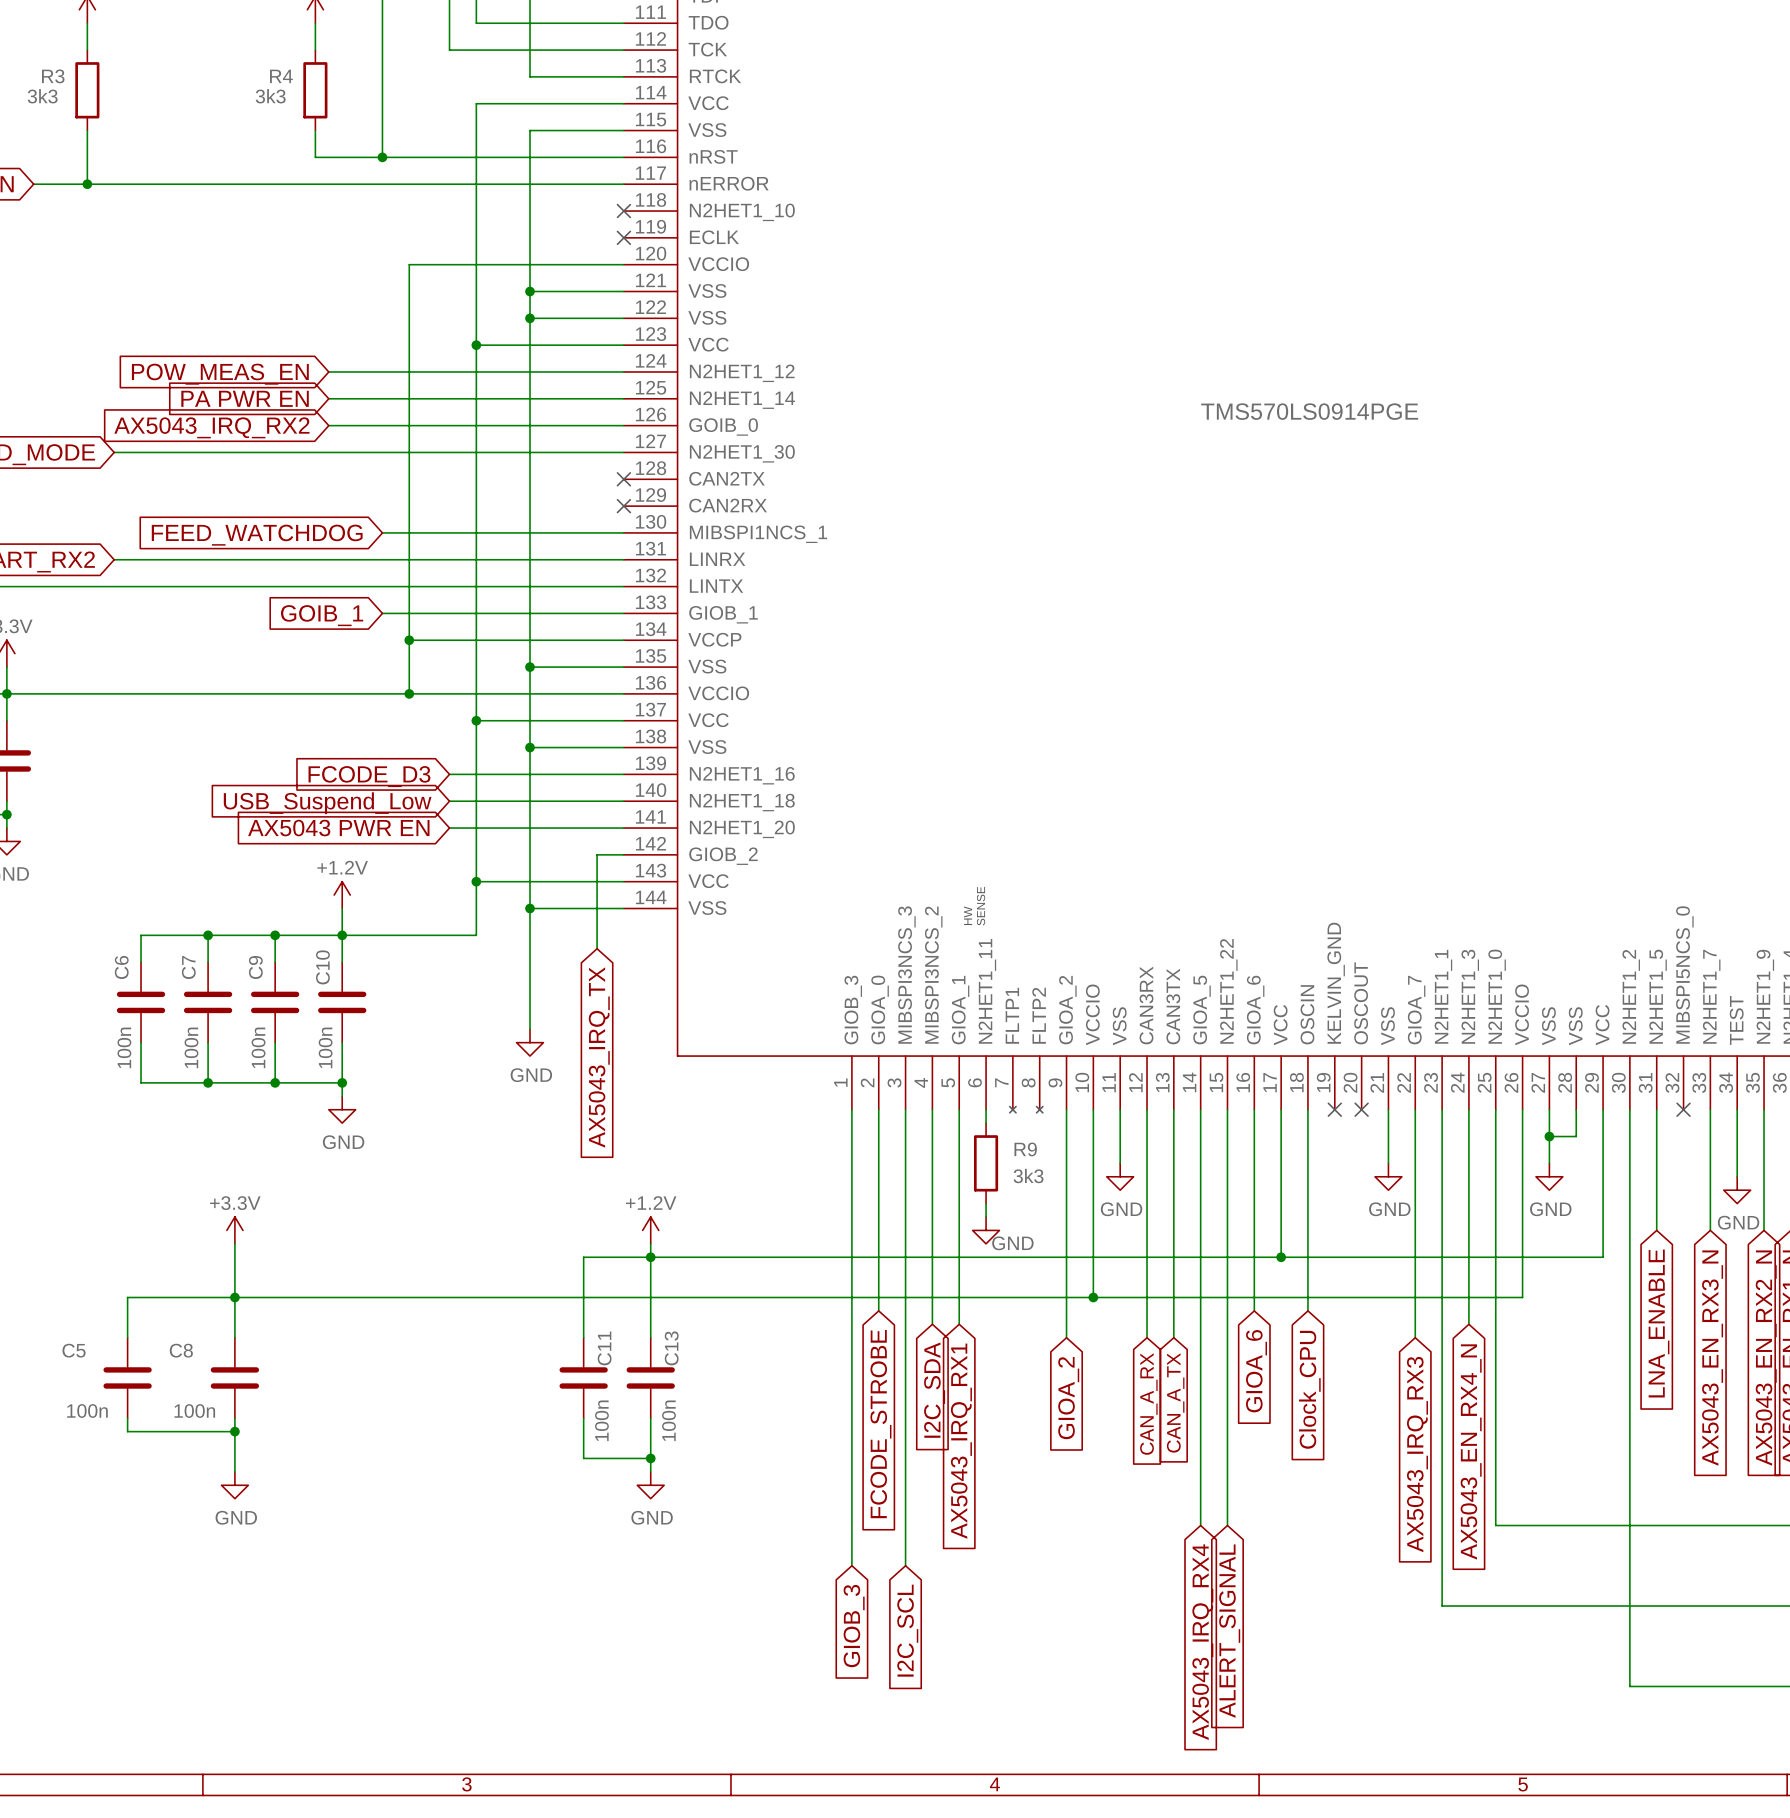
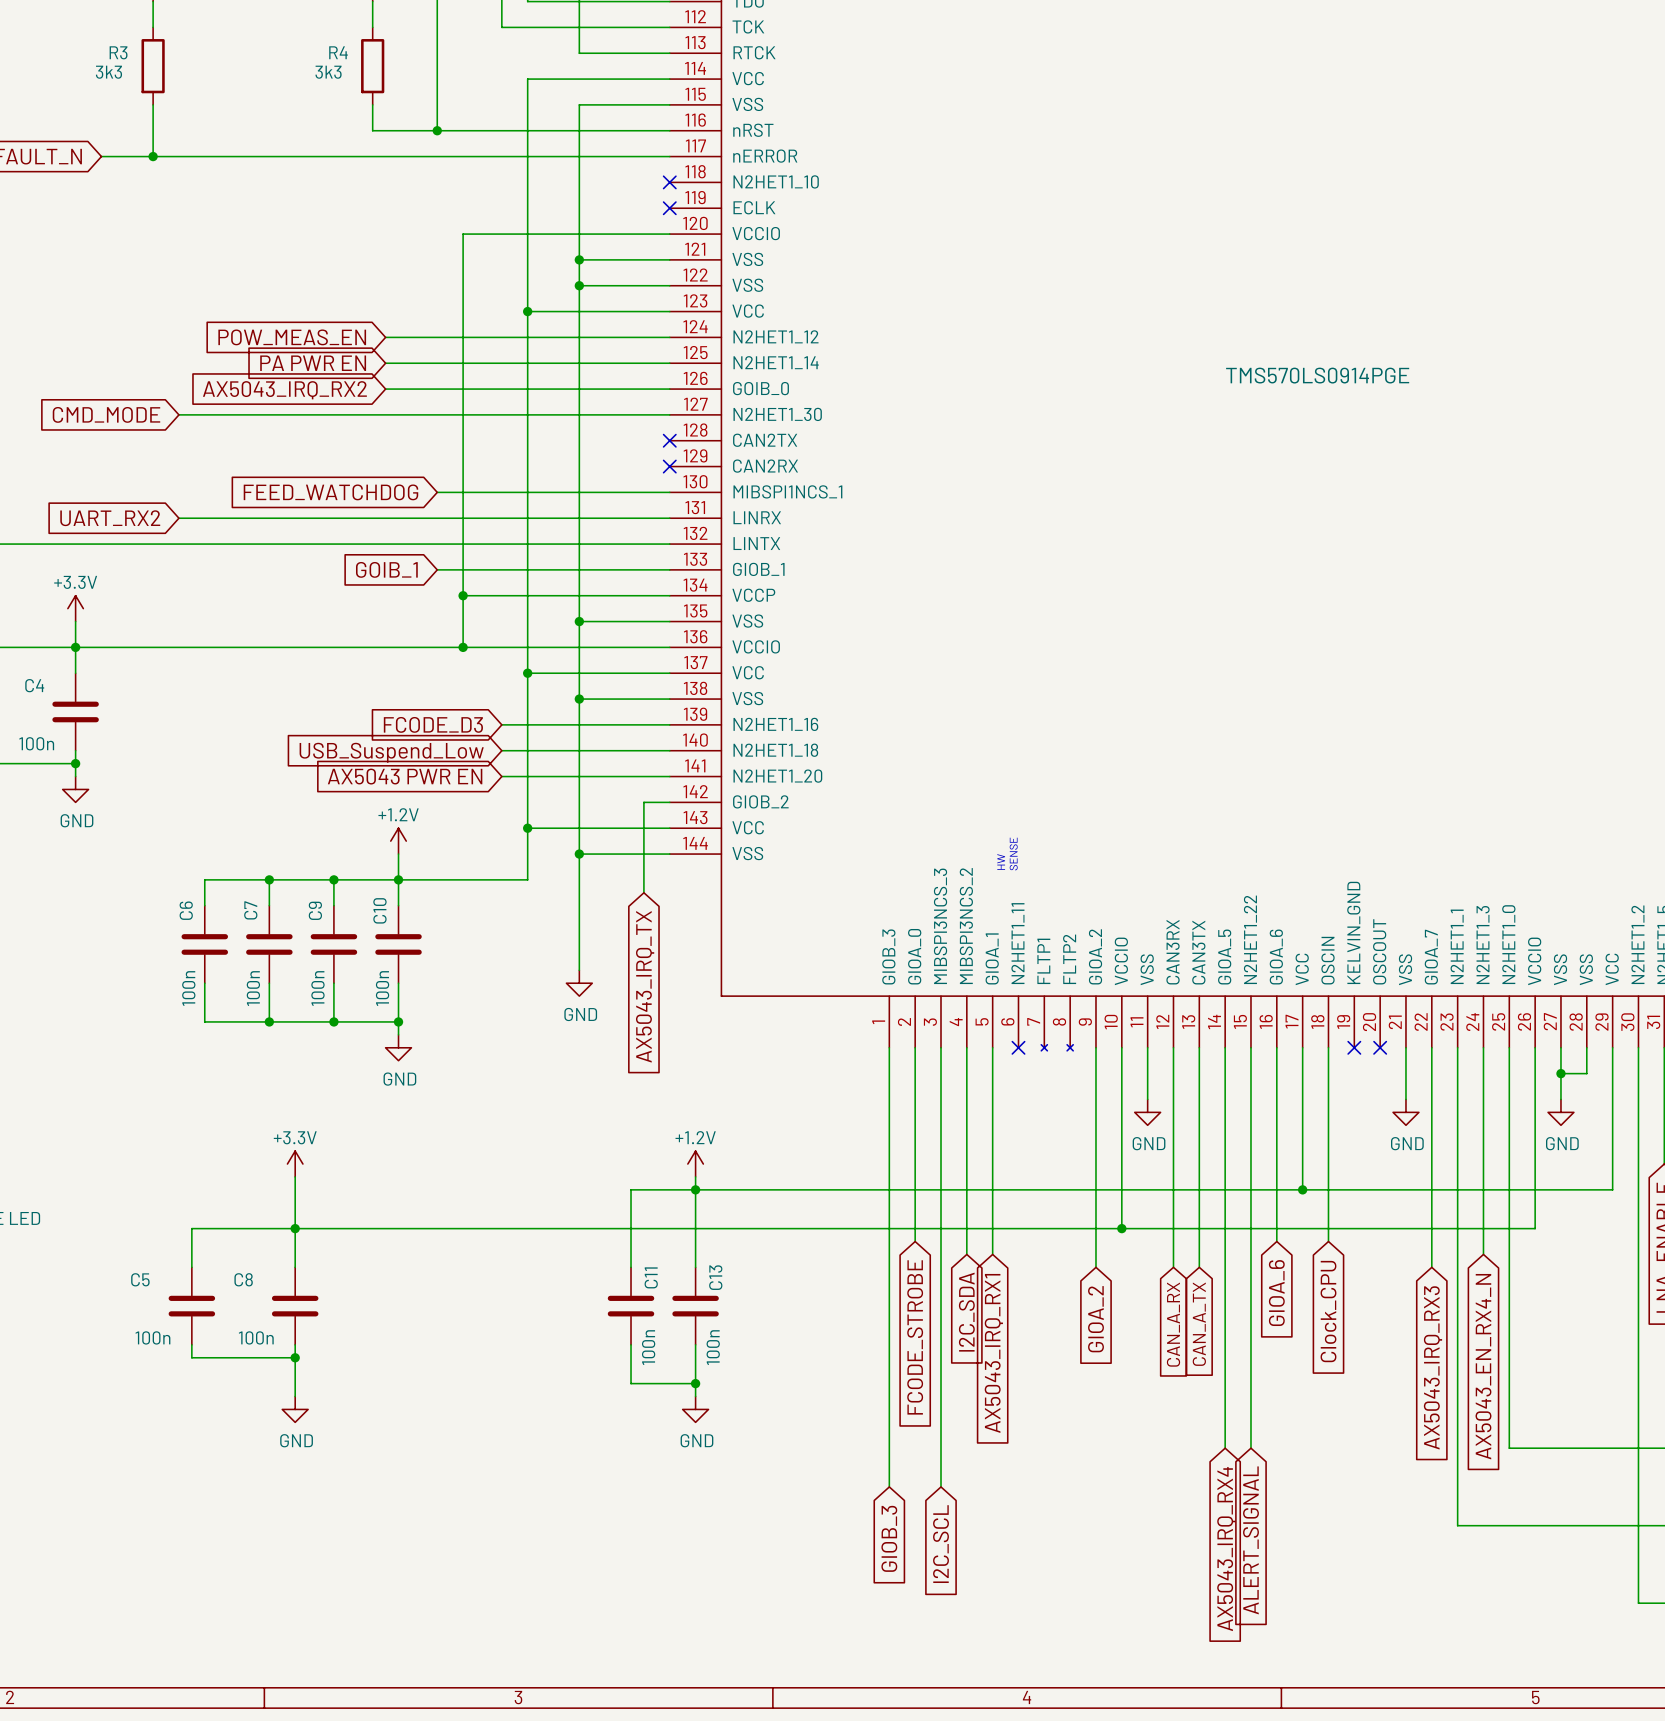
wire: (986, 1109) (986, 1123) -> none
no-connect mark: none -> (1018, 1047)
R9: 3k3 (986, 1163) -> none
wire: (986, 1203) (986, 1217) -> none
power symbol: GND (986, 1230) -> none

